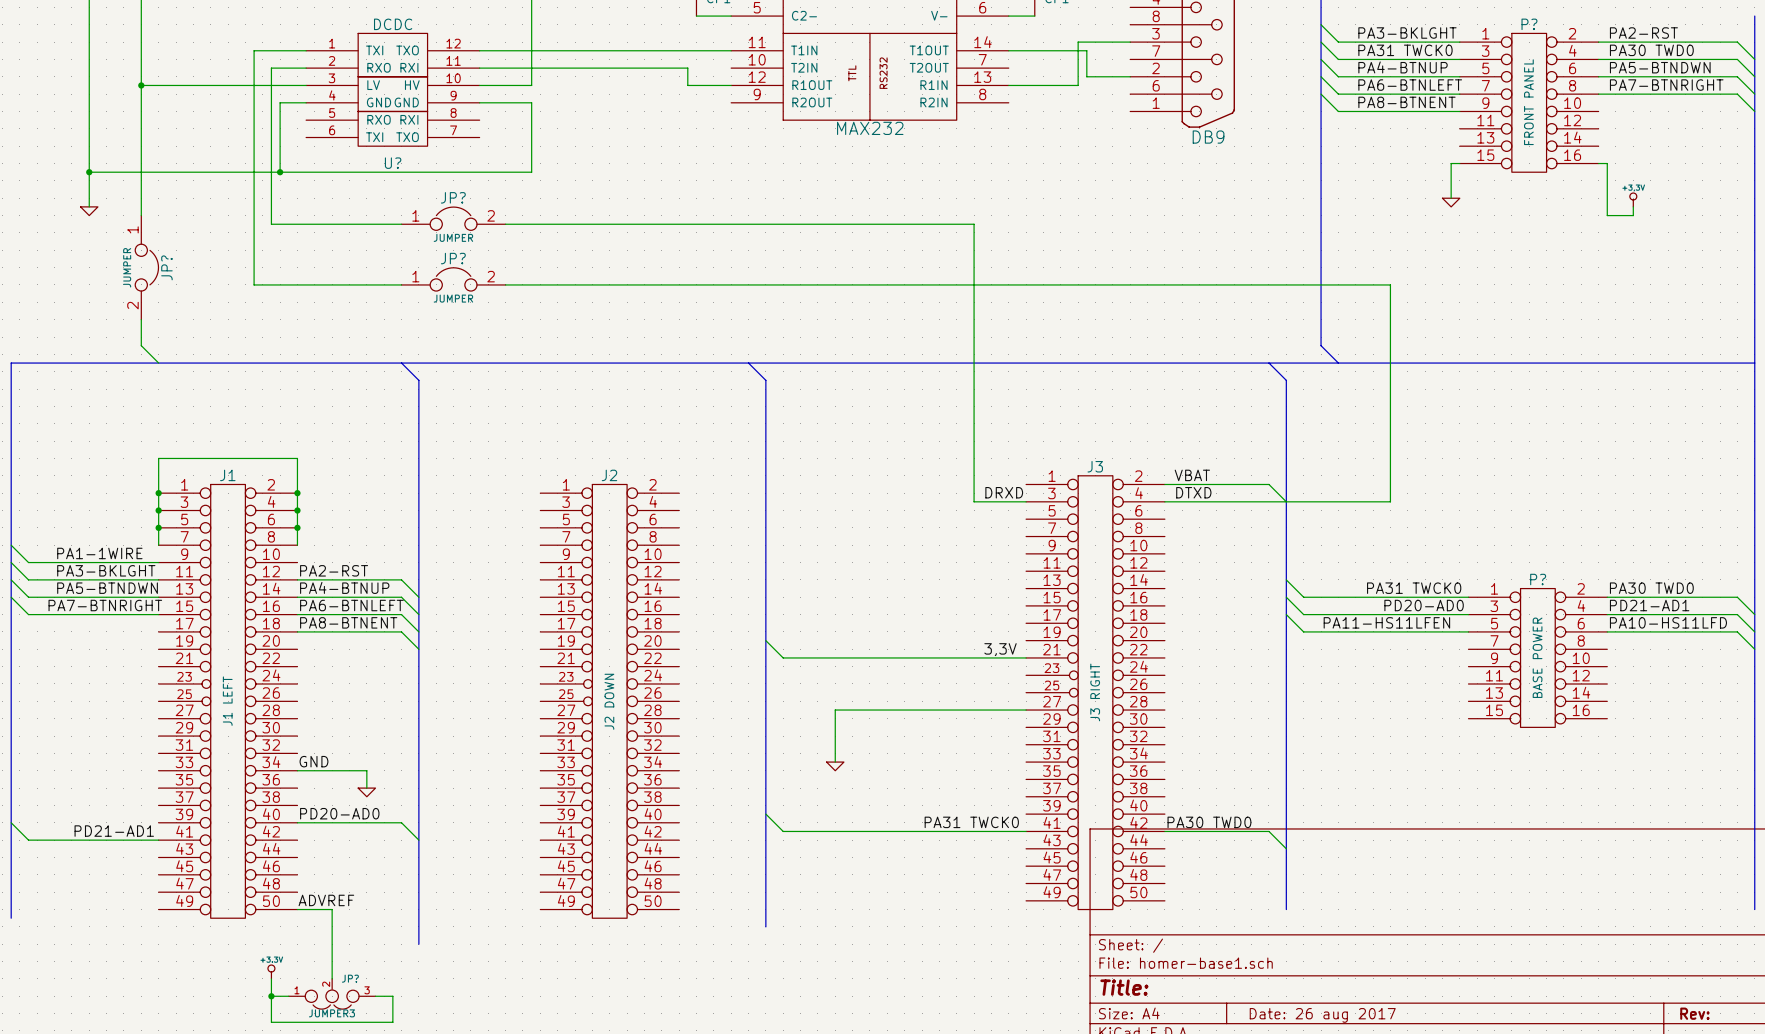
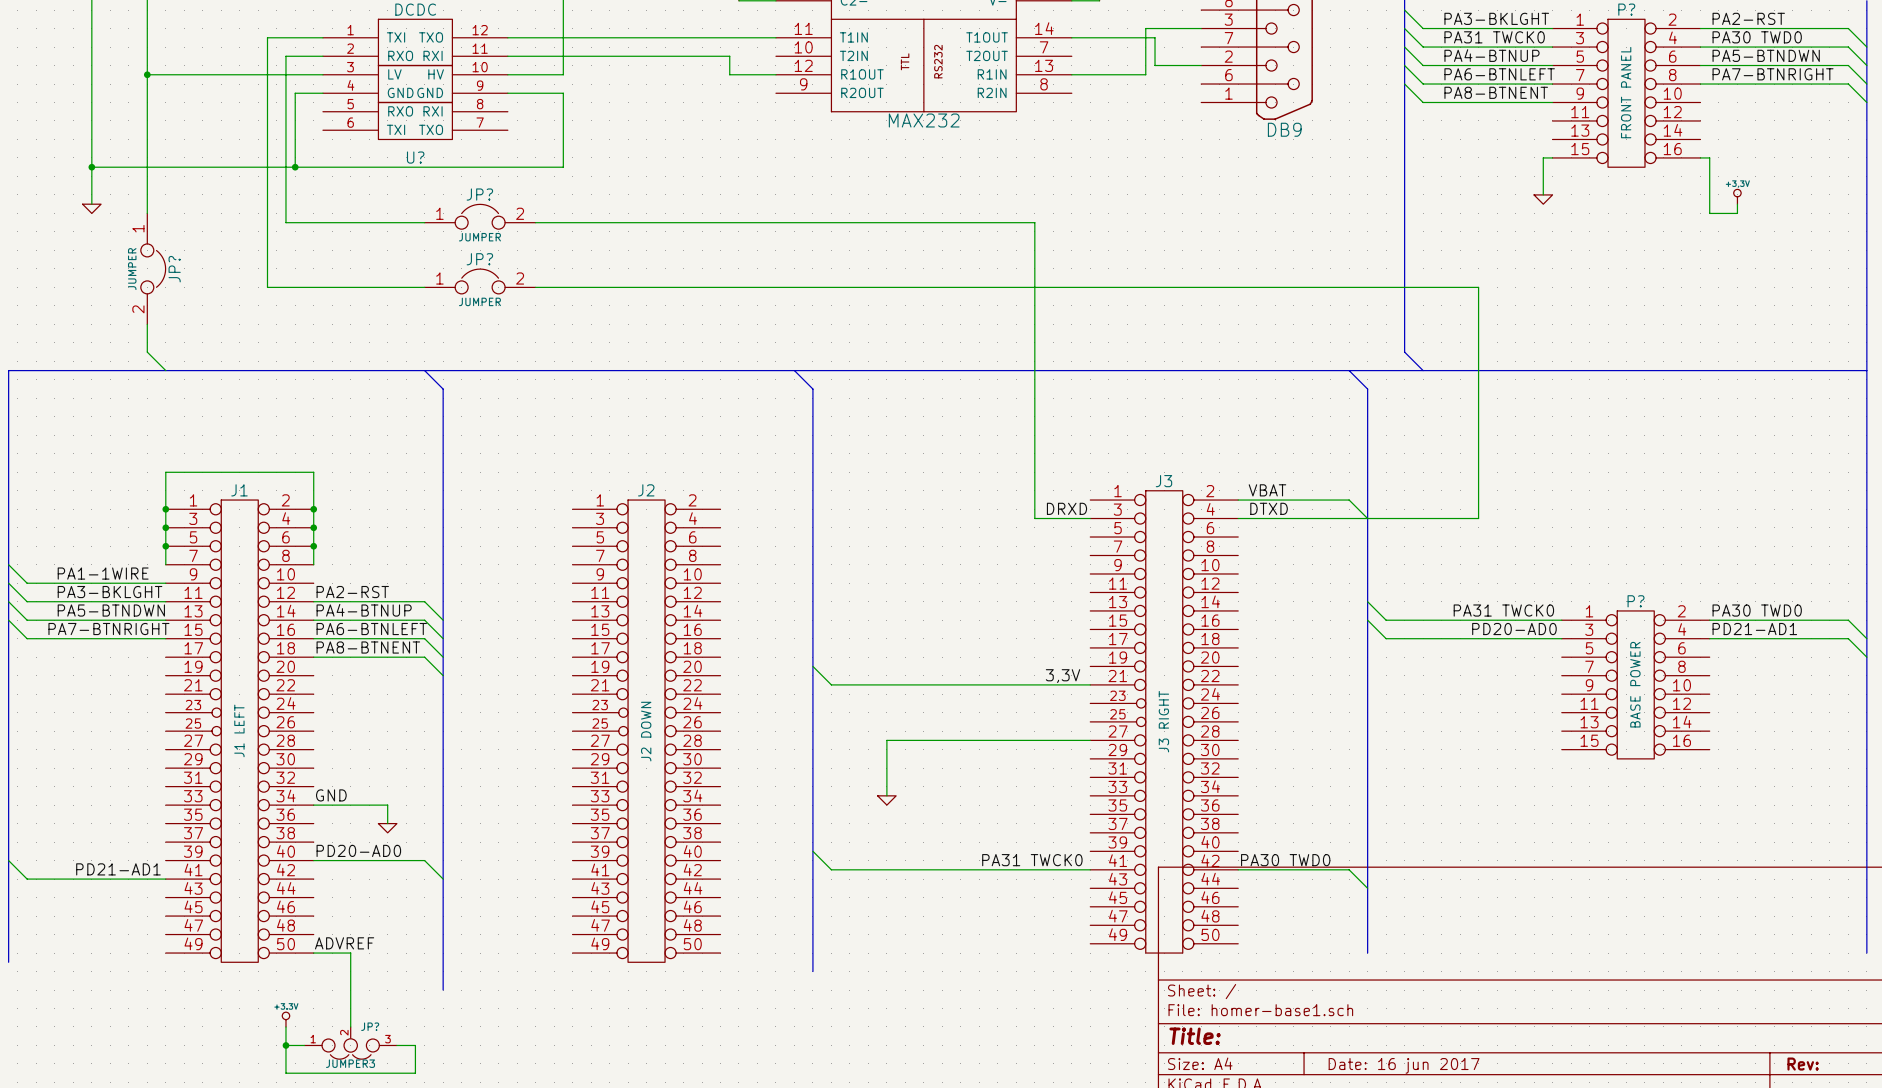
wire: (1286, 614) (1303, 631) (1468, 631) -> none
label: PA11-HS11LFEN (1386, 622) -> none
label: PA10-HS11LFD (1668, 622) -> none
wire: (1607, 631) (1737, 631) (1754, 649) -> none
title block: Date: 26 aug 2017 (1322, 1015) -> Date: 16 jun 2017 (1404, 1065)

